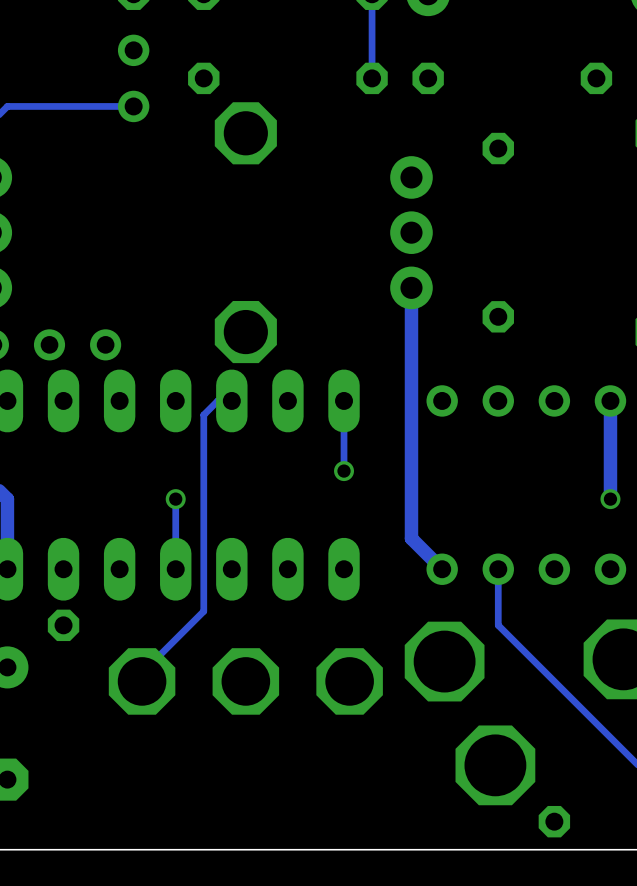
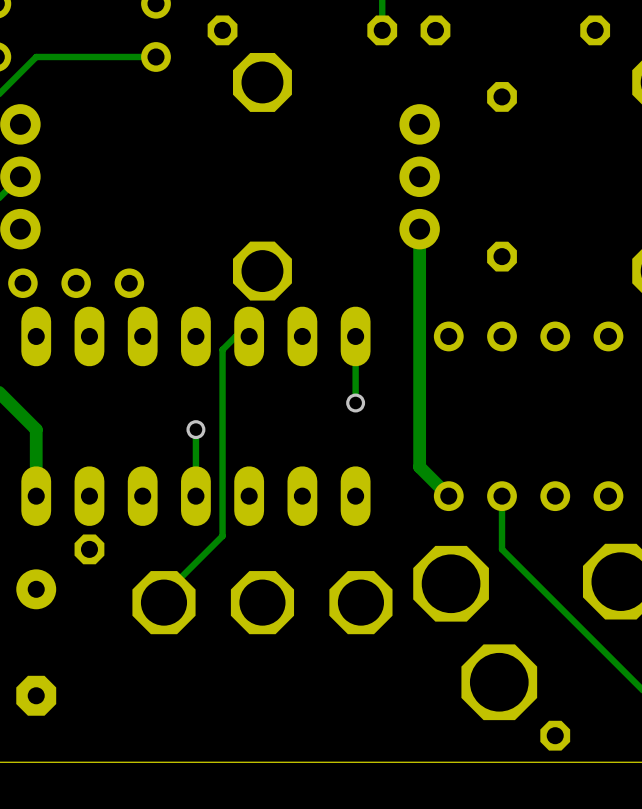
track: (610, 400) (610, 499) -> none
via: (610, 499) -> none

